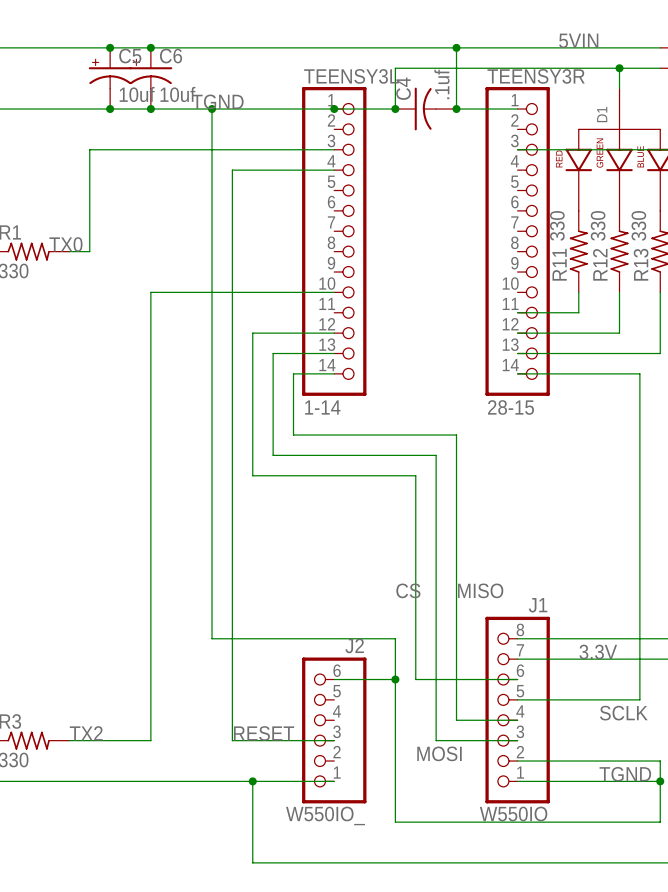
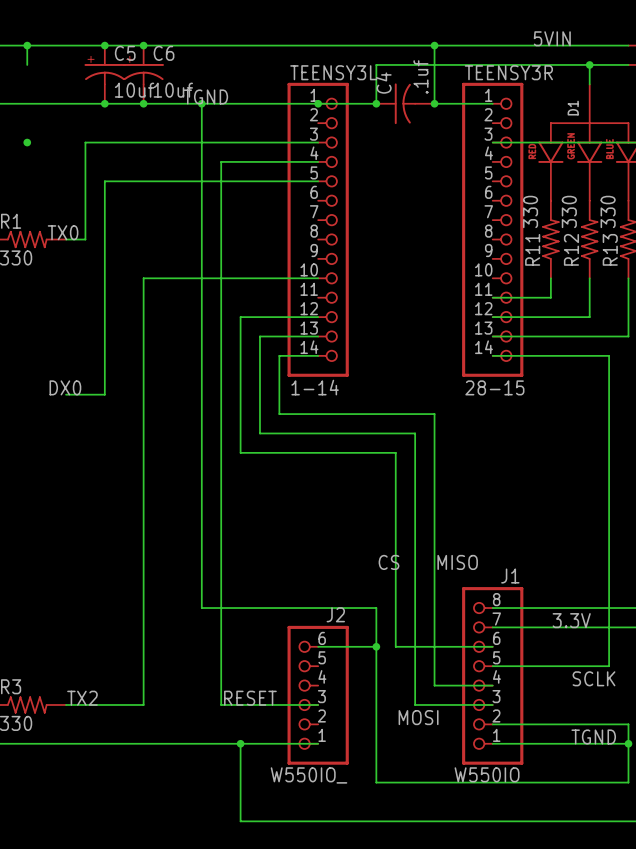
wire: none -> (27, 45) (27, 64)
junction: none -> (27, 45)
junction: none -> (27, 142)
wire: none -> (318, 181) (104, 181) (104, 394) (66, 394)
label: none -> DX0 (65, 387)

